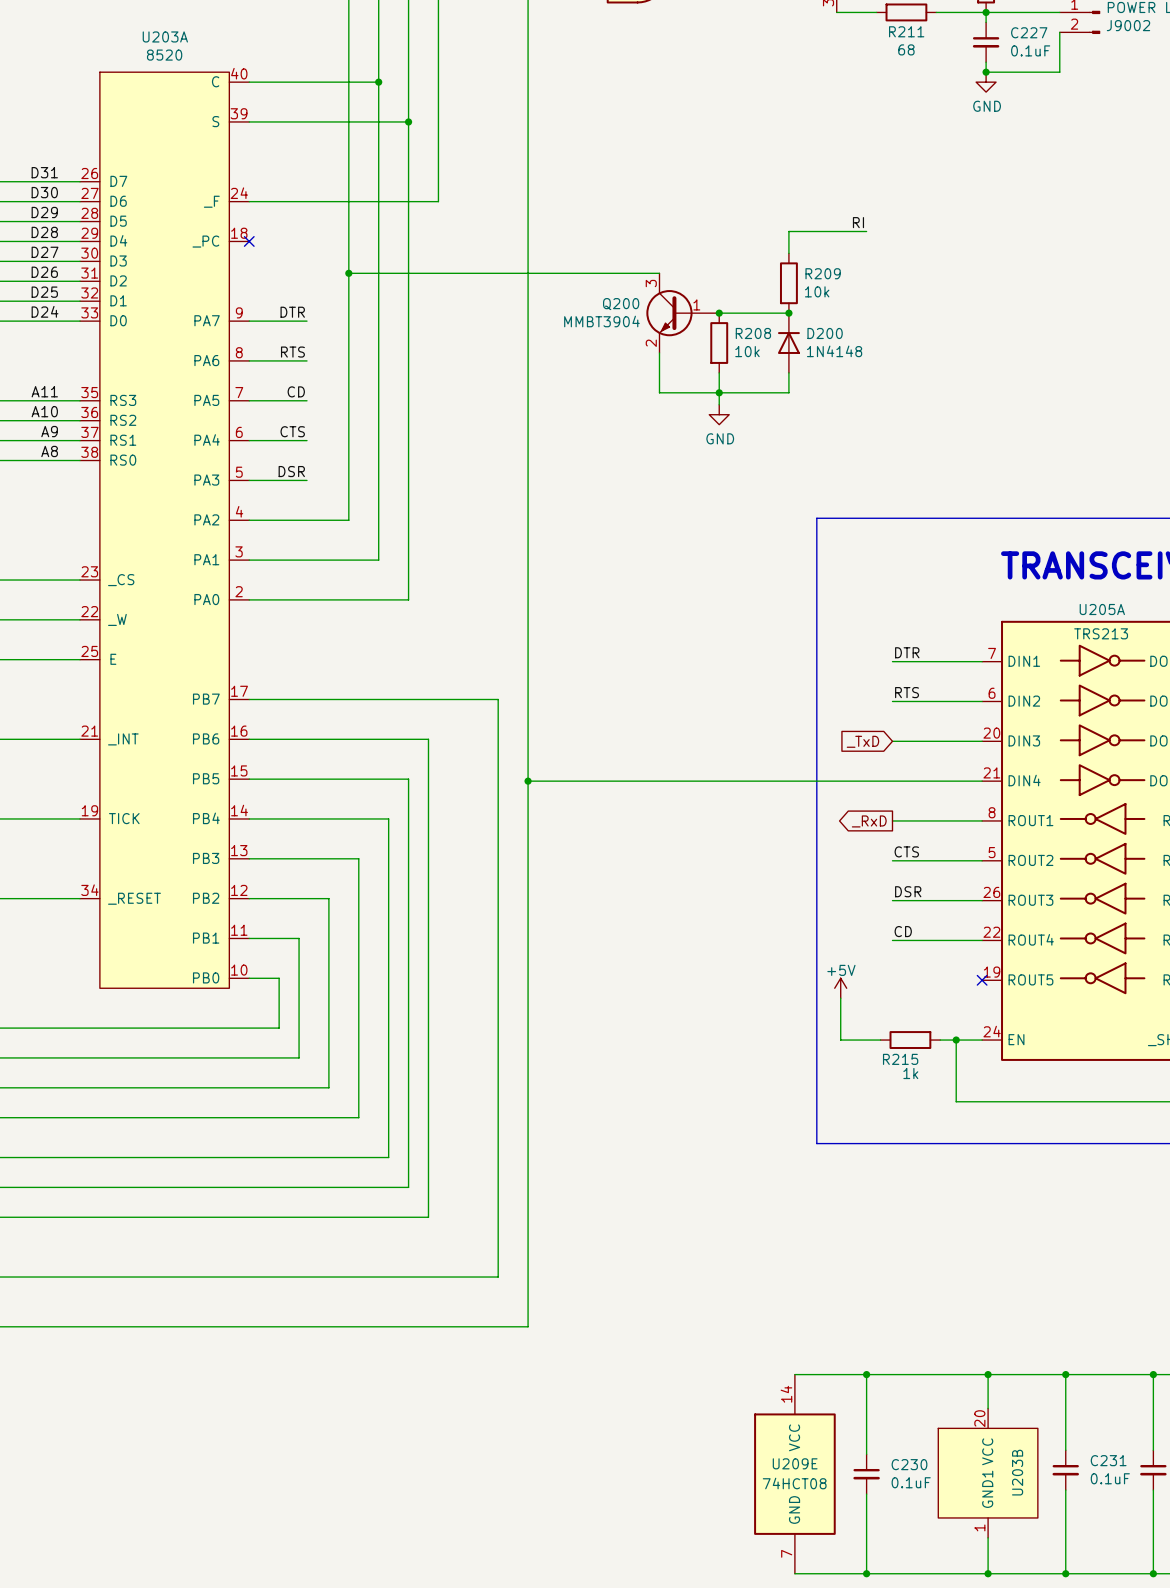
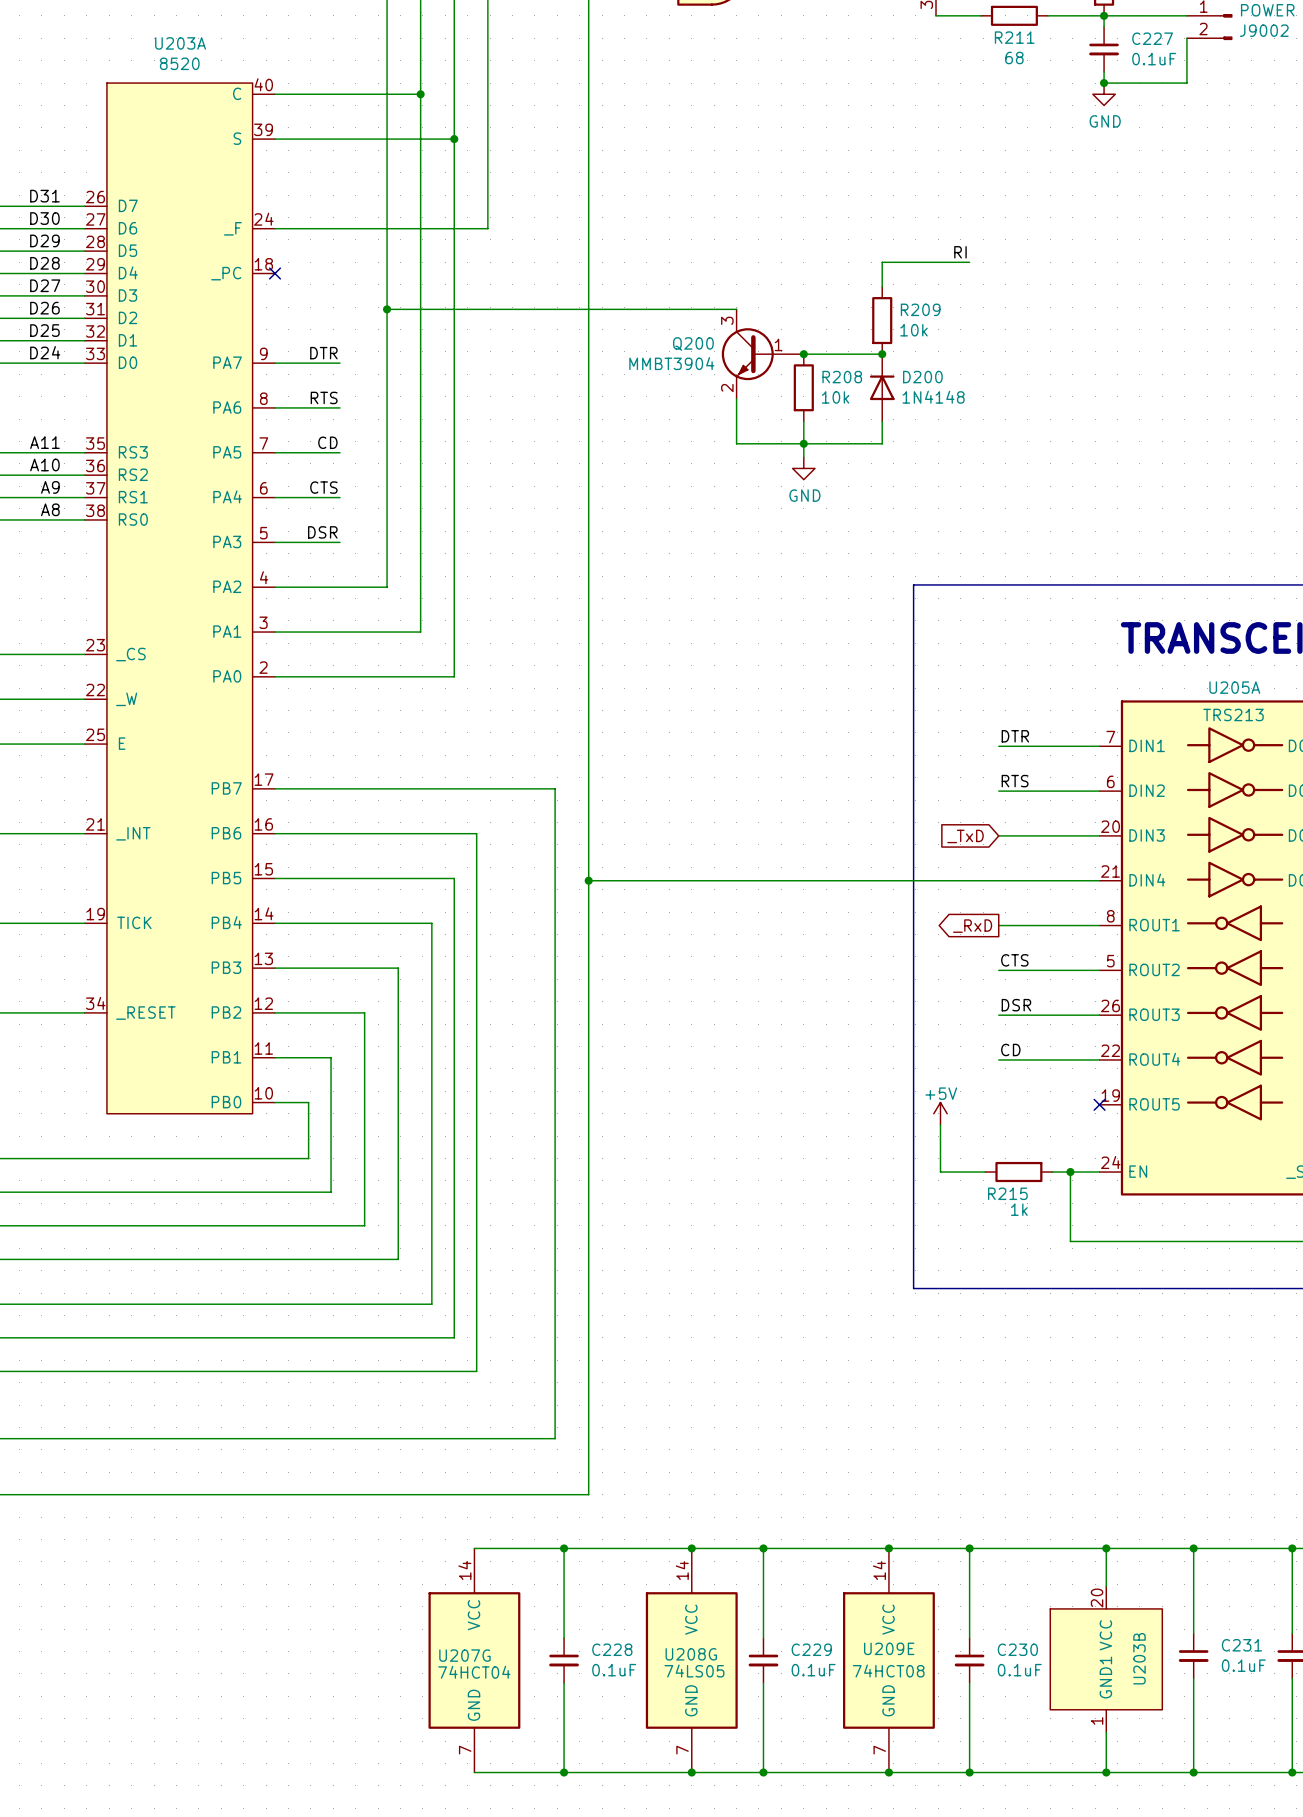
wire: none -> (474, 1548) (888, 1548)
wire: none -> (564, 1548) (564, 1638)
junction: none -> (564, 1548)
junction: none -> (691, 1548)
wire: none -> (763, 1548) (763, 1638)
junction: none -> (763, 1548)
junction: none -> (888, 1548)
U207G: none -> 74HCT04 (474, 1660)
C228: none -> 0.1uF (564, 1660)
U208G: none -> 74LS05 (691, 1660)
C229: none -> 0.1uF (763, 1660)
wire: none -> (564, 1682) (564, 1772)
wire: none -> (763, 1682) (763, 1772)
wire: none -> (474, 1772) (888, 1772)
junction: none -> (564, 1772)
junction: none -> (691, 1772)
junction: none -> (763, 1772)
junction: none -> (888, 1772)

